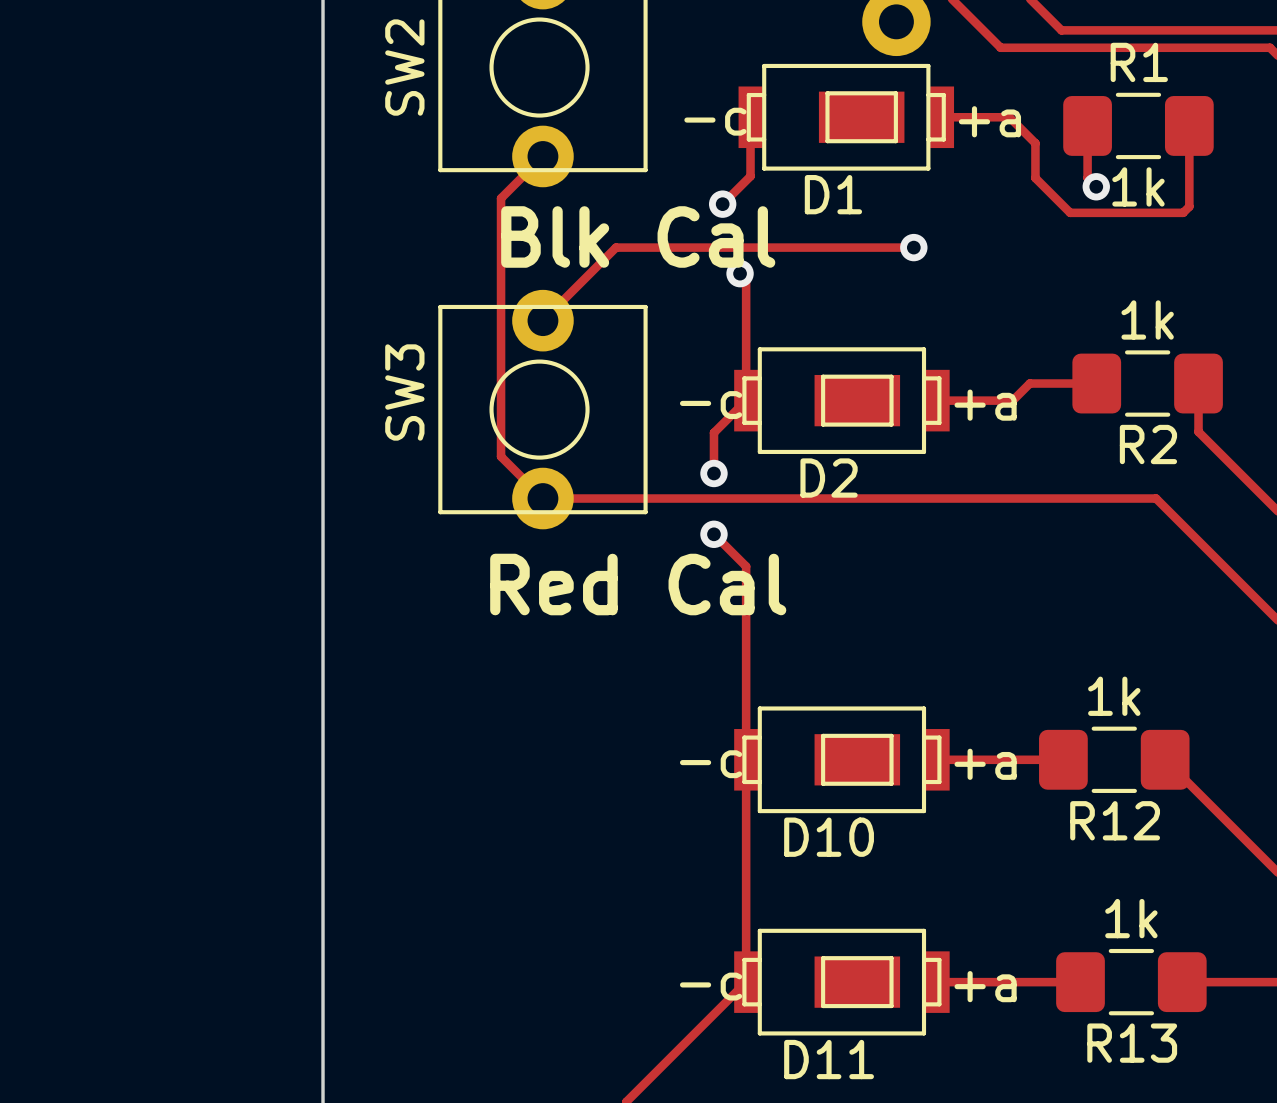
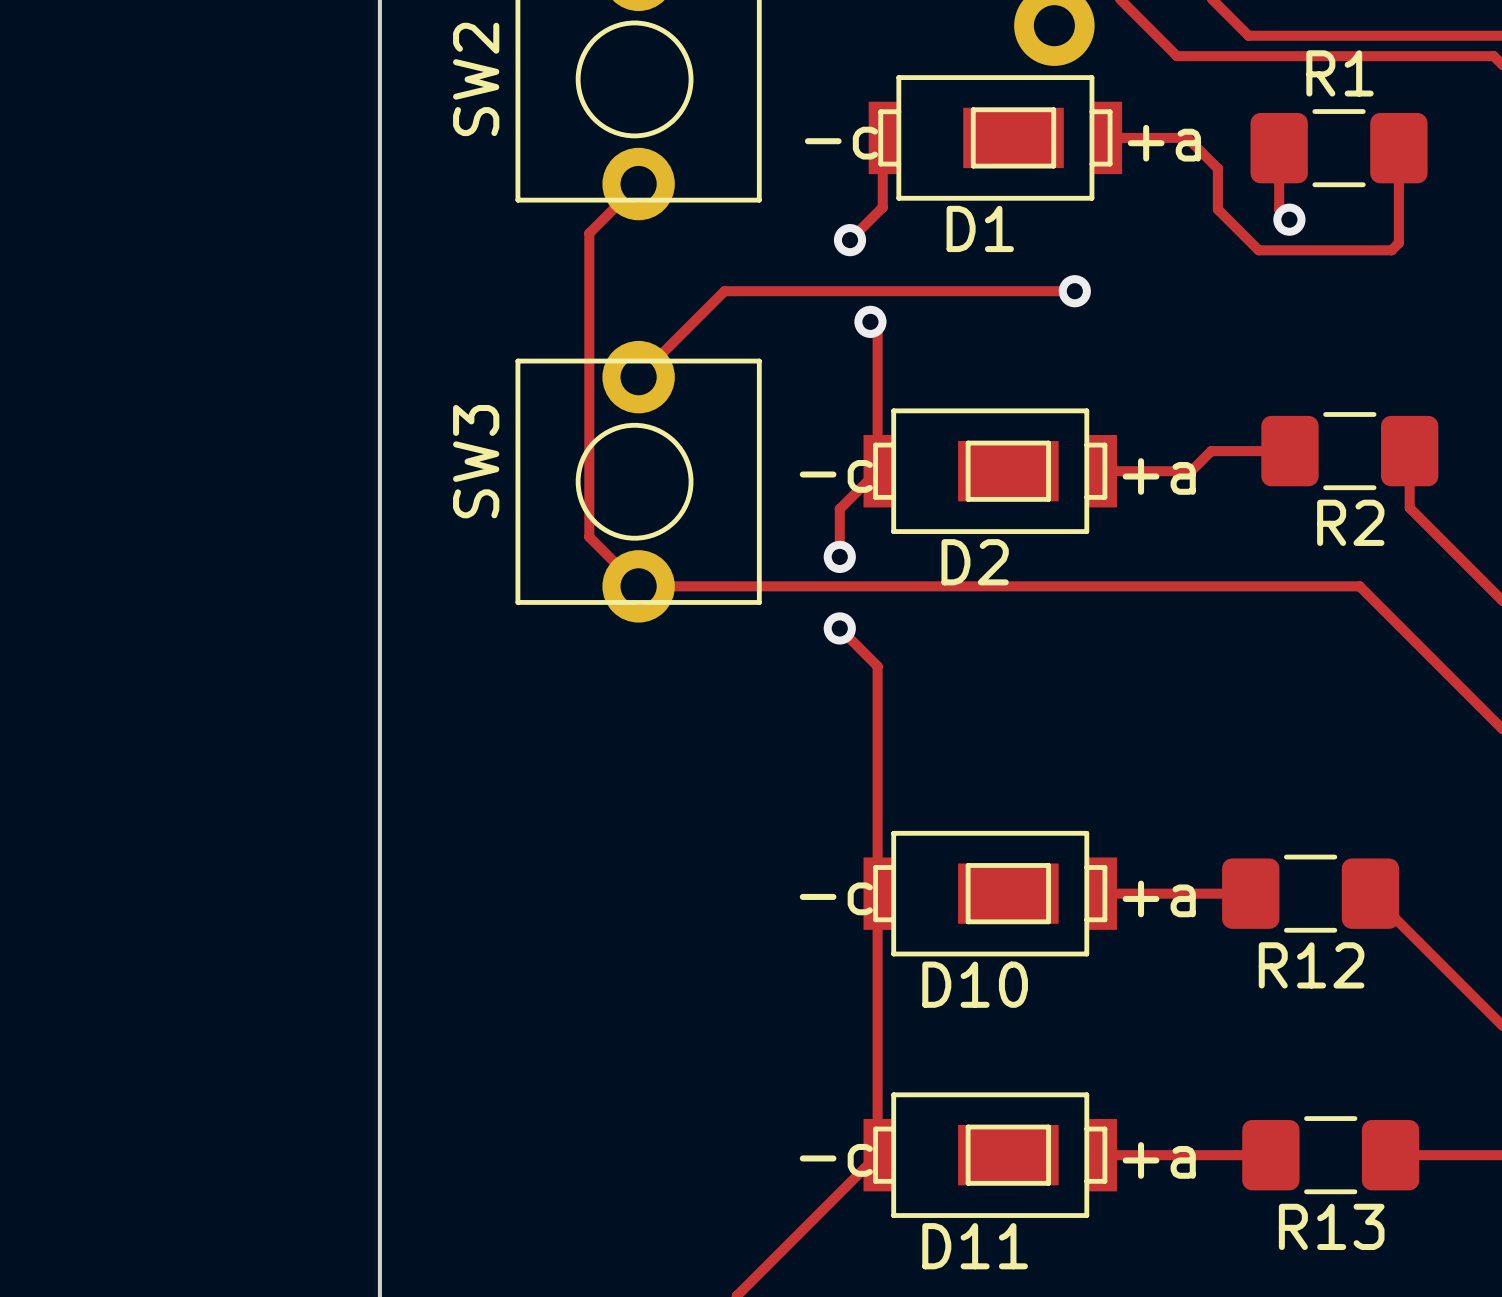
R1 value: 1k (1138, 186) -> none
text: Blk Cal (638, 236) -> none
R2 value: 1k (1147, 319) -> none
text: Red Cal (638, 584) -> none
R12 value: 1k (1114, 696) -> none
R13 value: 1k (1131, 918) -> none

